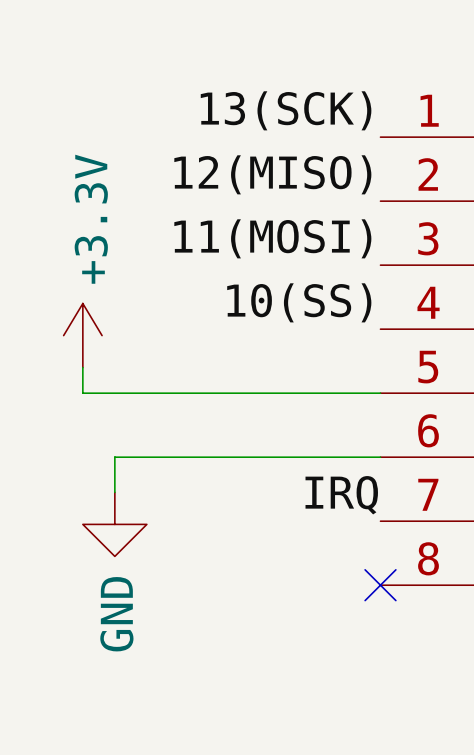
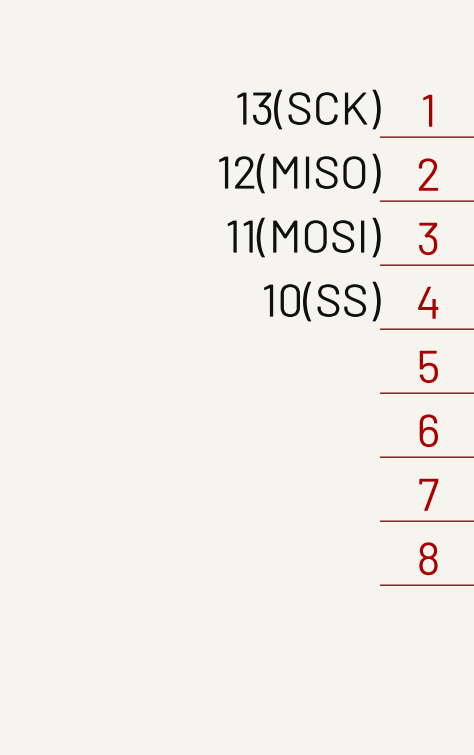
power symbol: +3.3V (82, 335) -> none
wire: (82, 367) (82, 393) (380, 393) -> none
wire: (380, 457) (114, 457) (114, 492) -> none
label: IRQ (341, 495) -> none
power symbol: GND (114, 524) -> none
no-connect mark: (380, 585) -> none

